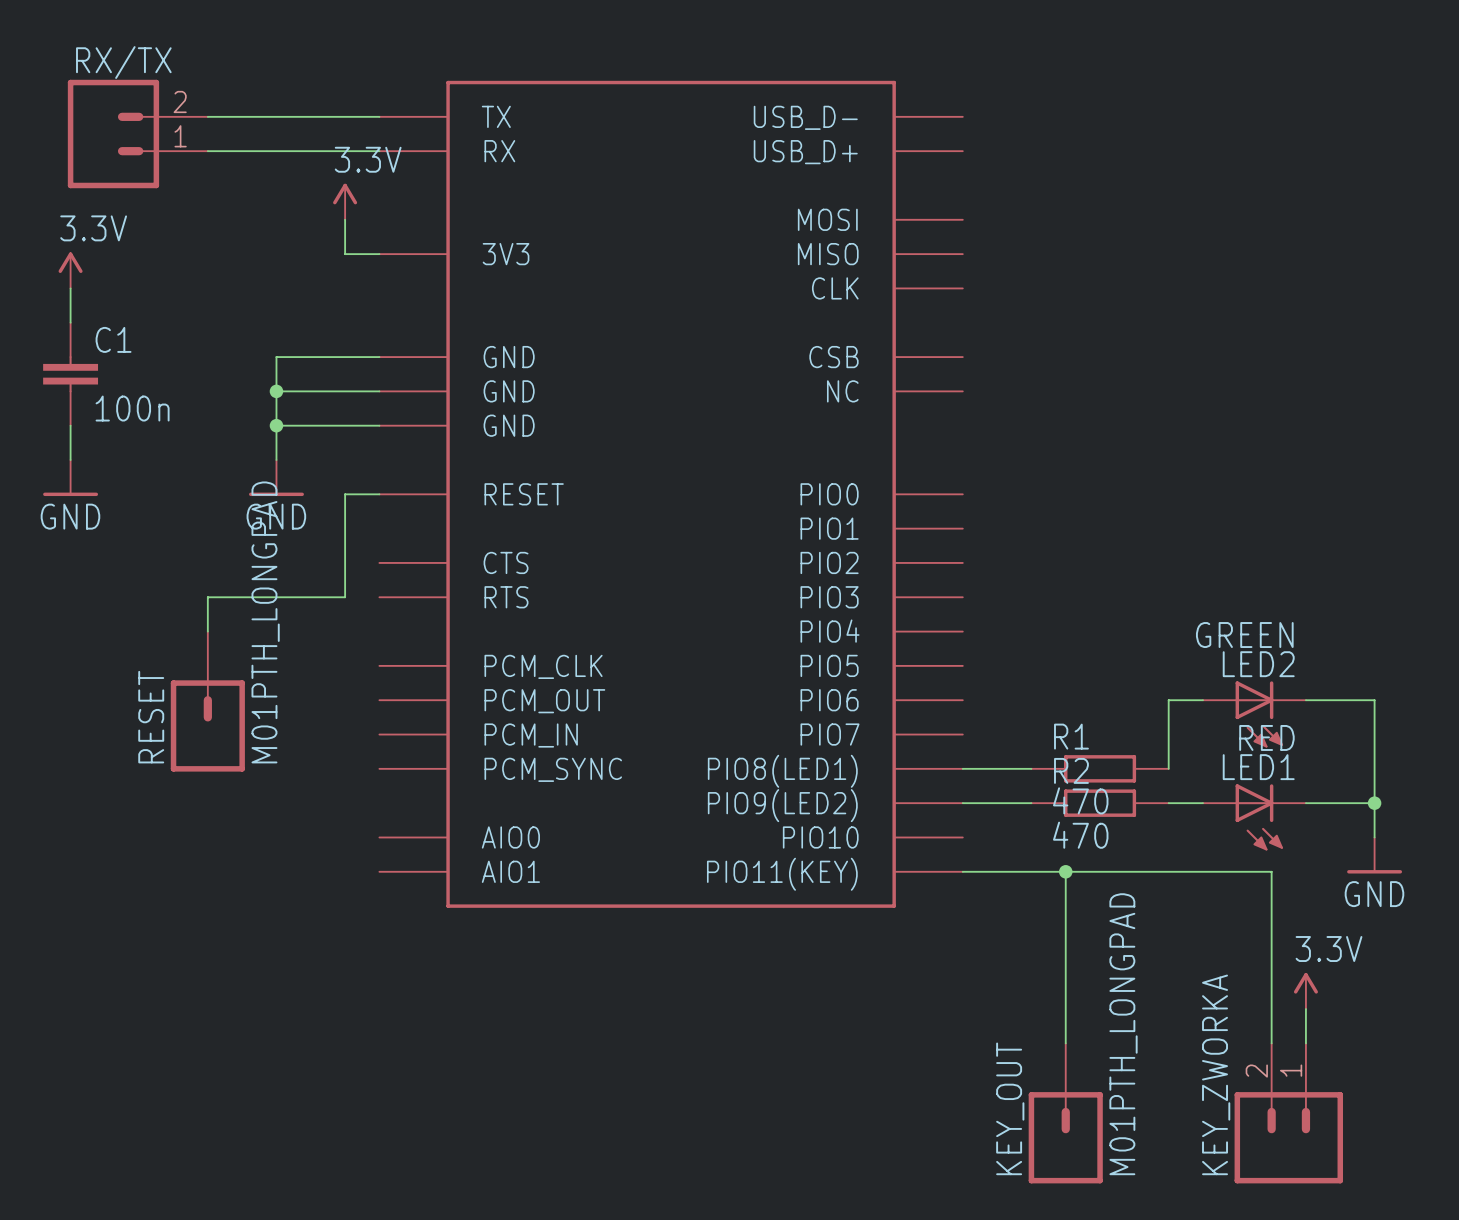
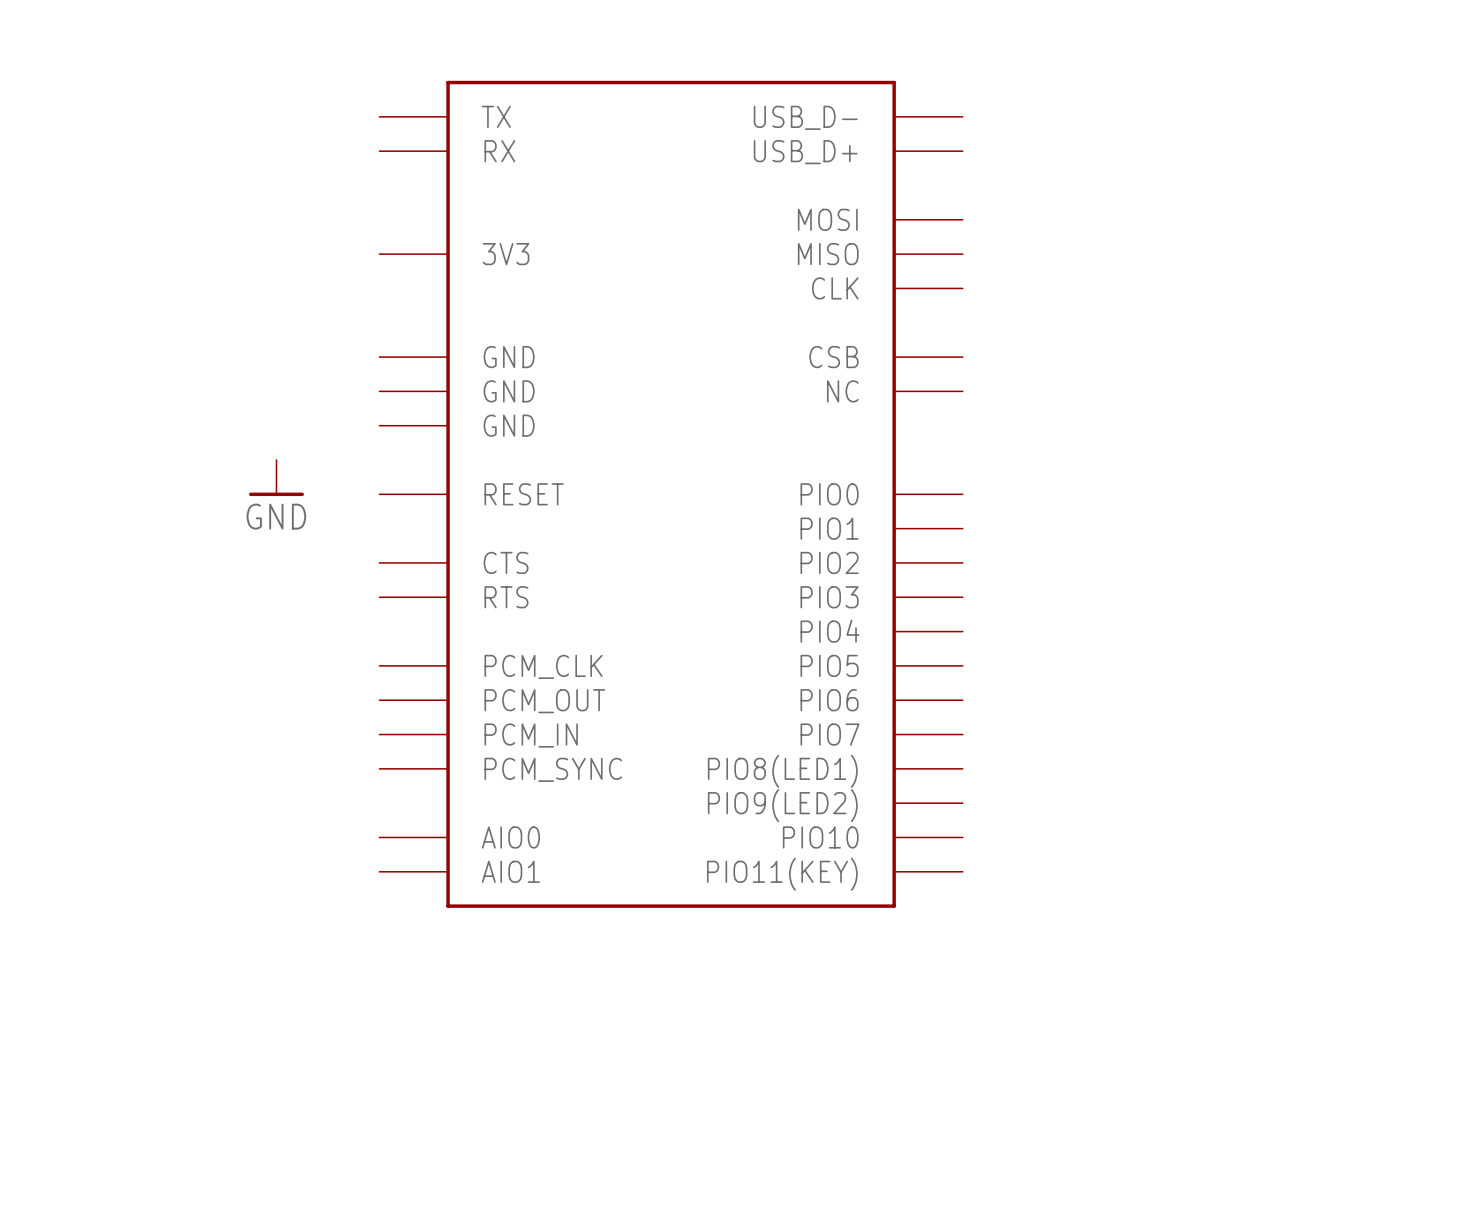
wire: (207, 116) (379, 116) -> none
RX/TX: (137, 134) -> none
wire: (207, 151) (379, 151) -> none
power symbol: 3.3V (345, 201) -> none
wire: (345, 219) (345, 254) (379, 254) -> none
power symbol: 3.3V (70, 270) -> none
wire: (70, 288) (70, 322) -> none
wire: (379, 357) (276, 357) (276, 460) -> none
C1: 100n (70, 374) -> none
wire: (276, 391) (379, 391) -> none
junction: (276, 391) -> none
wire: (70, 425) (70, 460) -> none
wire: (276, 425) (379, 425) -> none
junction: (276, 425) -> none
power symbol: GND (70, 478) -> none
wire: (379, 494) (345, 494) (345, 597) (207, 597) (207, 631) -> none
wire: (1203, 700) (1168, 700) (1168, 768) -> none
wire: (1305, 700) (1374, 700) (1374, 837) -> none
RESET: M01PTH_LONGPAD (207, 701) -> none
LED2: GREEN (1254, 714) -> none
wire: (962, 768) (1031, 768) -> none
R1: 470 (1100, 768) -> none
wire: (962, 803) (1031, 803) -> none
R2: 470 (1100, 803) -> none
wire: (1168, 803) (1203, 803) -> none
wire: (1305, 803) (1374, 803) -> none
junction: (1374, 803) -> none
LED1: RED (1254, 817) -> none
power symbol: GND (1374, 855) -> none
wire: (962, 871) (1271, 871) (1271, 1043) -> none
wire: (1065, 871) (1065, 1043) -> none
junction: (1065, 871) -> none
power symbol: 3.3V (1305, 991) -> none
wire: (1305, 1009) (1305, 1043) -> none
KEY_OUT: M01PTH_LONGPAD (1065, 1113) -> none
KEY_ZWORKA: (1288, 1113) -> none

